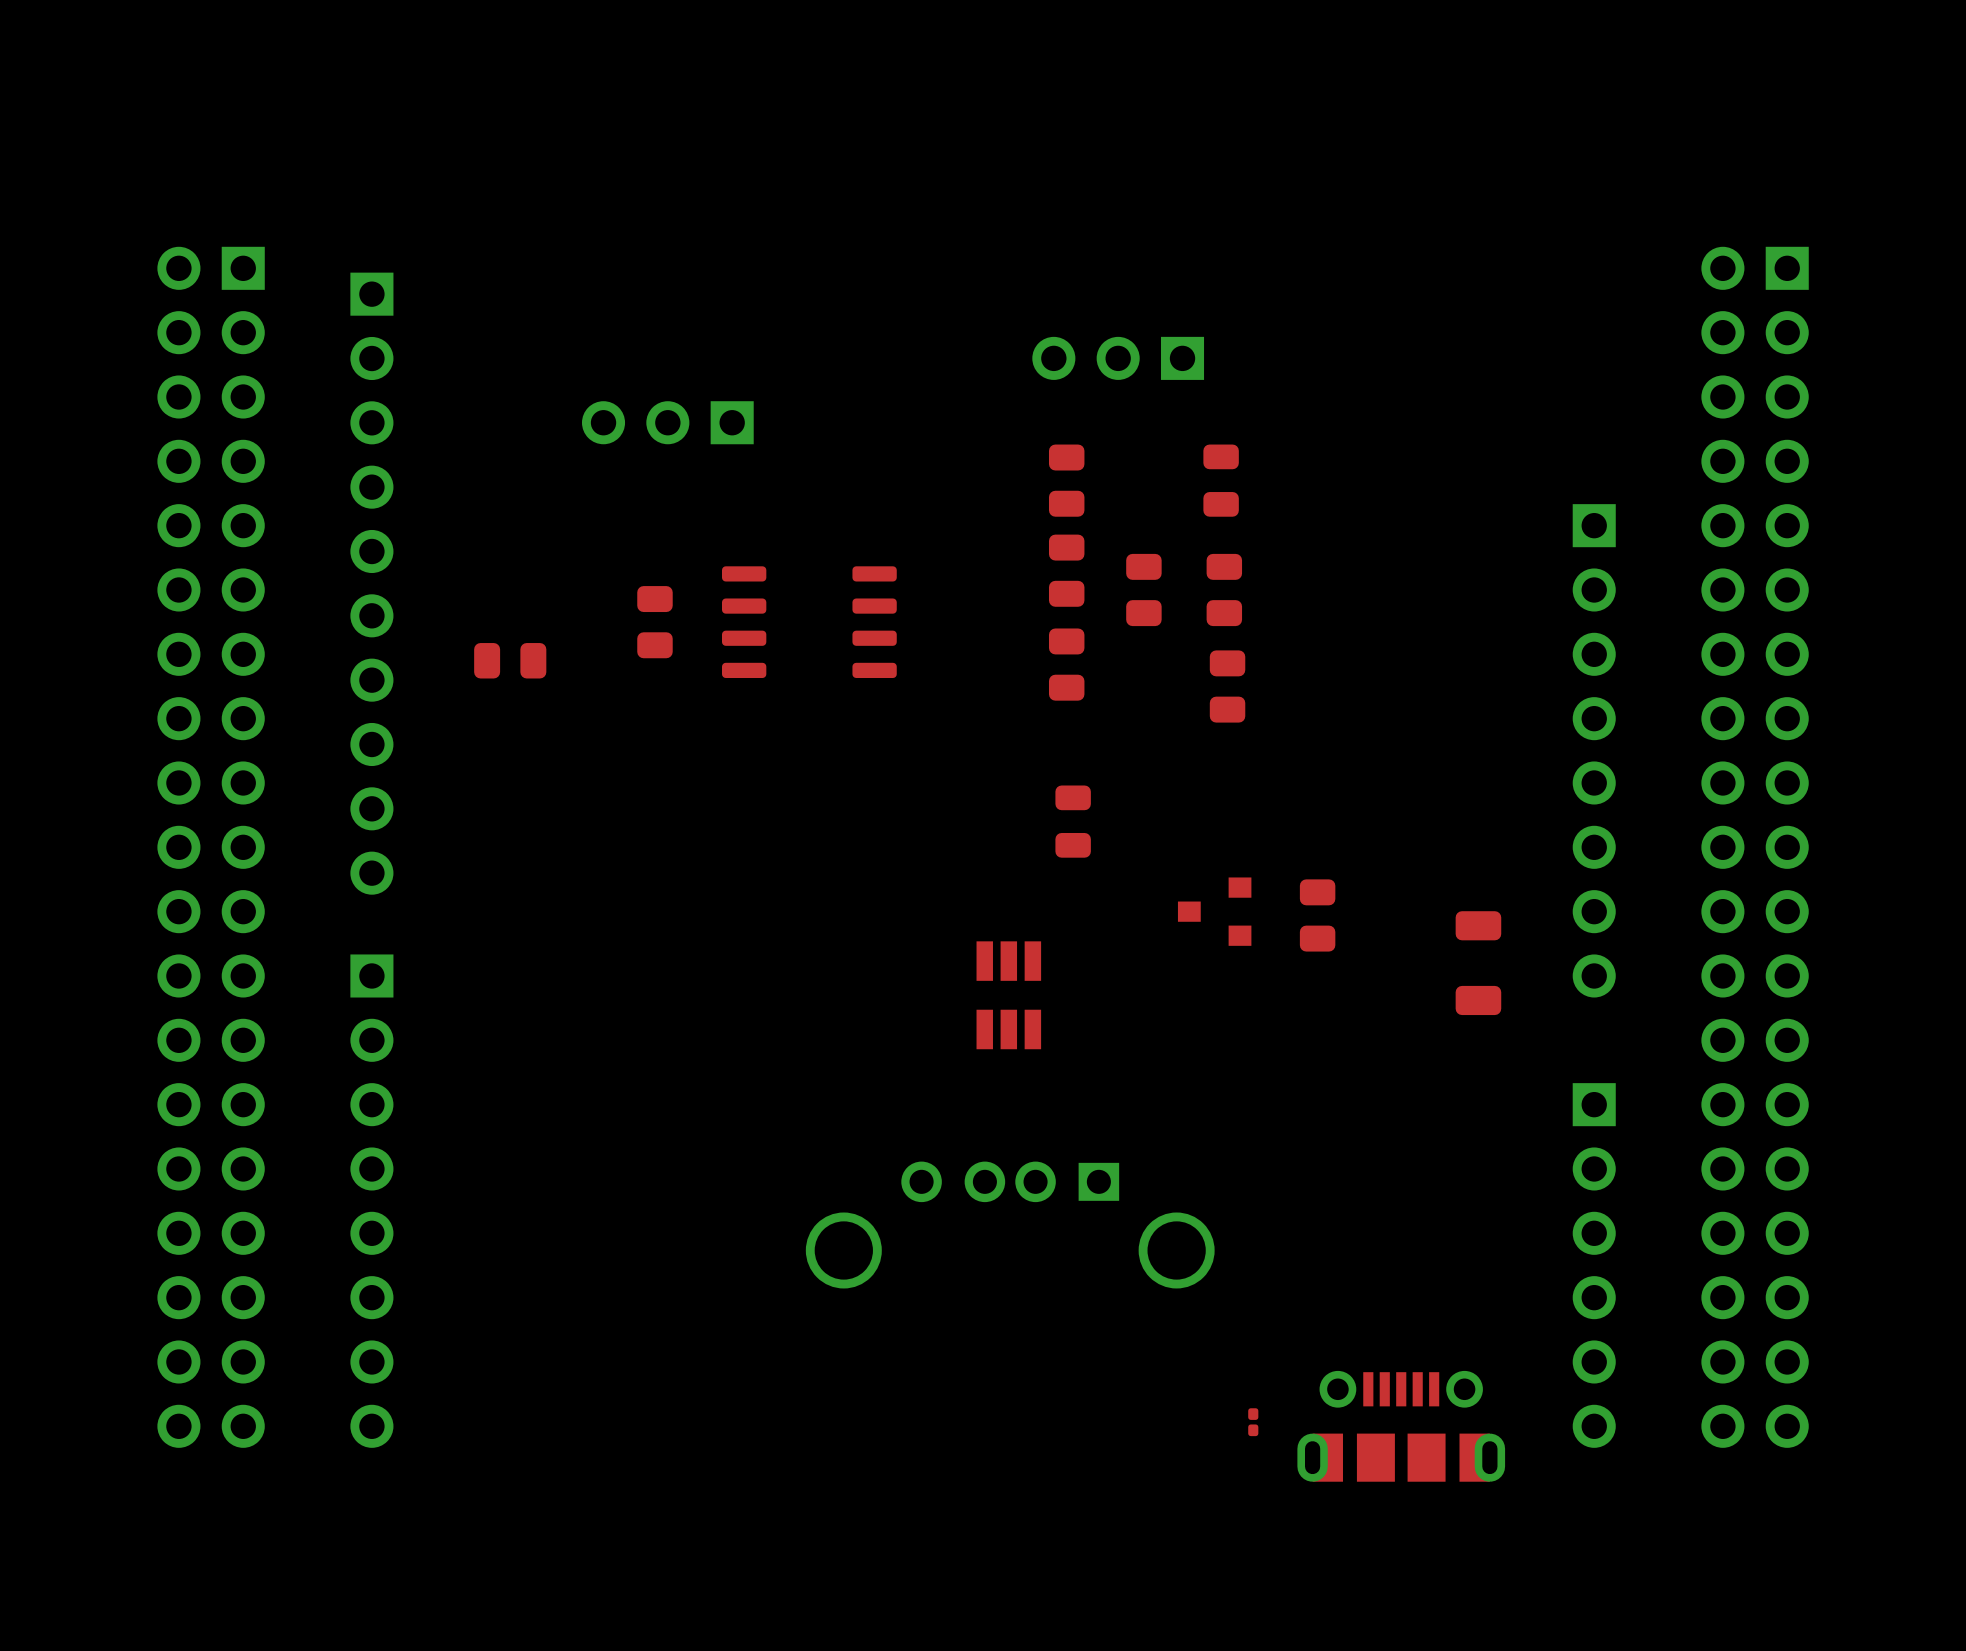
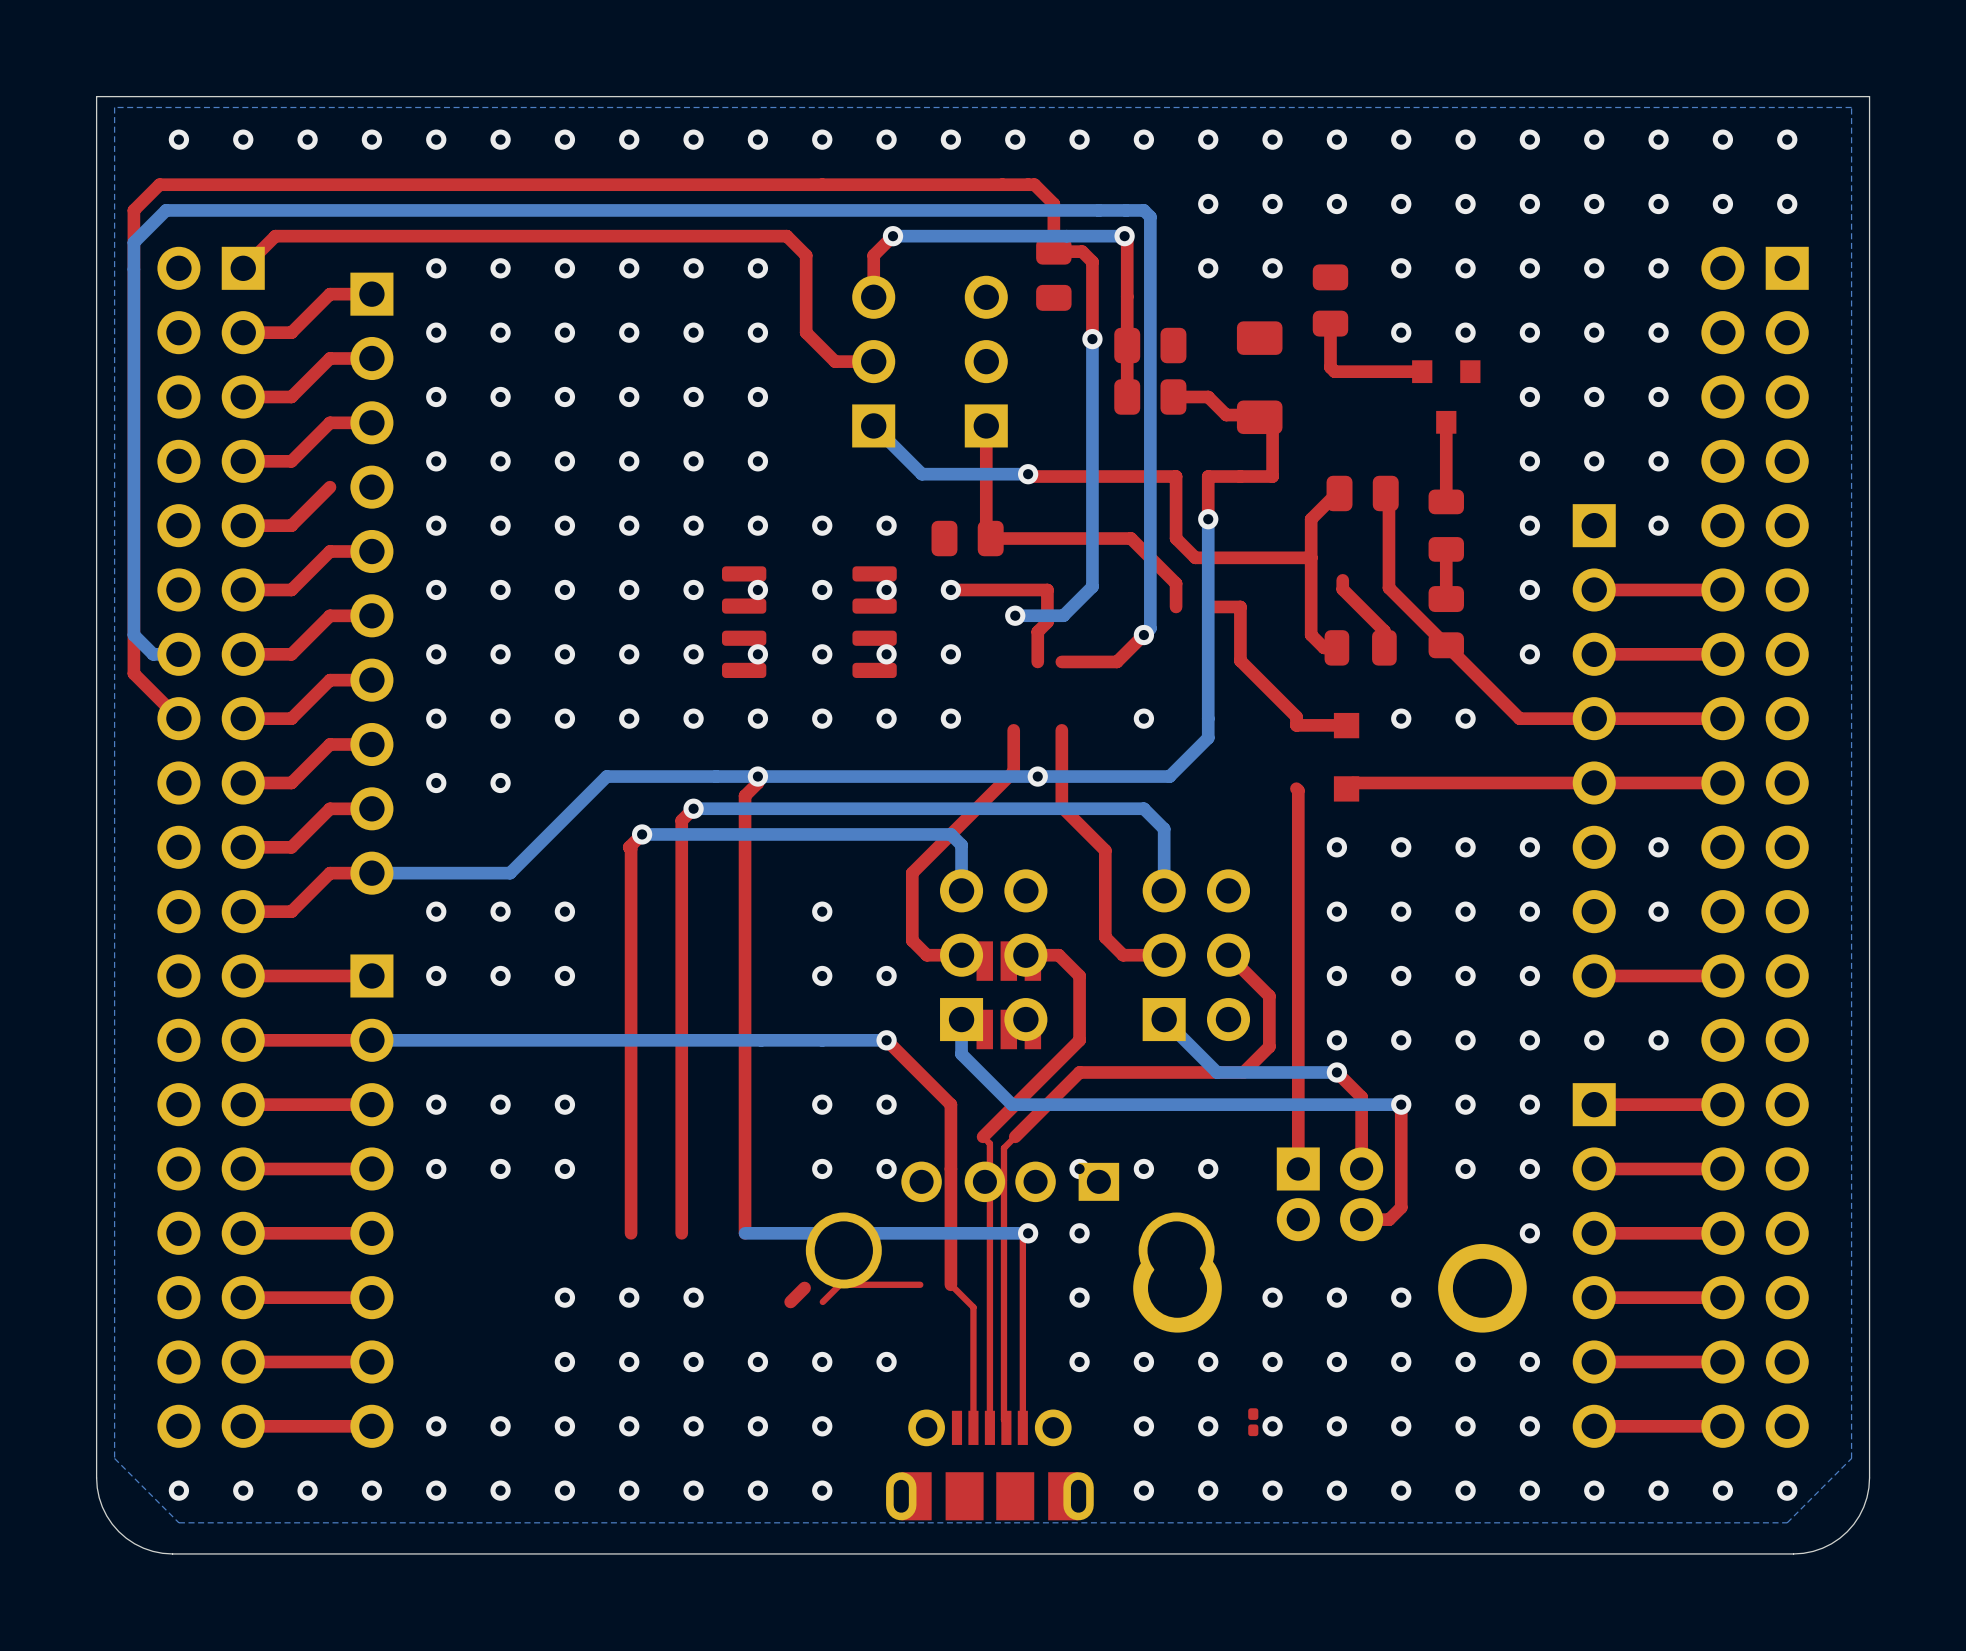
board edge: none -> (1869, 96) (1869, 1477) (1866, 1497) (1859, 1515) (1839, 1538) (1822, 1548) (1793, 1553) (172, 1553) (143, 1548) (126, 1538) (112, 1524) (102, 1507) (96, 1477) (96, 96) (1869, 96)
bottom zone outline: none -> (1851, 107) (1851, 1458) (1787, 1522) (178, 1522) (114, 1458) (114, 107) (1851, 107)
via: none -> (178, 139)
via: none -> (243, 139)
via: none -> (307, 139)
via: none -> (371, 139)
via: none -> (436, 139)
via: none -> (500, 139)
via: none -> (564, 139)
via: none -> (629, 139)
via: none -> (693, 139)
via: none -> (757, 139)
via: none -> (822, 139)
via: none -> (886, 139)
via: none -> (950, 139)
via: none -> (1015, 139)
via: none -> (1079, 139)
via: none -> (1143, 139)
via: none -> (1208, 139)
via: none -> (1272, 139)
via: none -> (1336, 139)
via: none -> (1401, 139)
via: none -> (1465, 139)
via: none -> (1529, 139)
via: none -> (1594, 139)
via: none -> (1658, 139)
via: none -> (1722, 139)
via: none -> (1787, 139)
via: none -> (1208, 203)
via: none -> (1272, 203)
via: none -> (1336, 203)
via: none -> (1401, 203)
via: none -> (1465, 203)
via: none -> (1529, 203)
via: none -> (1594, 203)
via: none -> (1658, 203)
via: none -> (1722, 203)
via: none -> (1787, 203)
top track: none -> (893, 236) (873, 255) (873, 297) (869, 301)
via: none -> (893, 236)
top track: none -> (1124, 236) (1127, 238) (1127, 396)
bottom track: none -> (1124, 236) (893, 236)
via: none -> (1124, 236)
top track: none -> (243, 268) (275, 236) (786, 236) (806, 255) (806, 332) (835, 361) (873, 361)
via: none -> (436, 268)
via: none -> (500, 268)
via: none -> (564, 268)
via: none -> (629, 268)
via: none -> (693, 268)
via: none -> (757, 268)
via: none -> (1208, 268)
via: none -> (1272, 268)
via: none -> (1401, 268)
via: none -> (1465, 268)
via: none -> (1529, 268)
via: none -> (1594, 268)
via: none -> (1658, 268)
part: none -> (1053, 274)
top track: none -> (371, 294) (330, 294) (291, 332) (243, 332)
part: none -> (1330, 300)
top track: none -> (1330, 323) (1330, 367) (1334, 371) (1422, 371)
via: none -> (436, 332)
via: none -> (500, 332)
via: none -> (564, 332)
via: none -> (629, 332)
via: none -> (693, 332)
via: none -> (757, 332)
via: none -> (1401, 332)
via: none -> (1465, 332)
via: none -> (1529, 332)
via: none -> (1594, 332)
via: none -> (1658, 332)
top track: none -> (1092, 339) (1092, 261) (1082, 251) (1053, 251) (1053, 203) (1034, 184) (159, 184) (133, 210) (133, 673) (178, 718)
bottom track: none -> (1092, 339) (1092, 586) (1063, 615) (1015, 615)
via: none -> (1092, 339)
part: none -> (1150, 345)
top track: none -> (371, 358) (330, 358) (291, 396) (243, 396)
part: (1118, 358) -> none
part: none -> (873, 361)
part: none -> (986, 361)
part: none -> (1259, 377)
top track: none -> (1174, 395) (1173, 396) (1208, 396) (1226, 415) (1259, 415) (1272, 427) (1272, 476) (1208, 476) (1208, 519)
via: none -> (436, 396)
via: none -> (500, 396)
via: none -> (564, 396)
via: none -> (629, 396)
via: none -> (693, 396)
via: none -> (757, 396)
part: none -> (1150, 396)
via: none -> (1529, 396)
via: none -> (1594, 396)
via: none -> (1658, 396)
top track: none -> (371, 422) (330, 422) (291, 461) (243, 461)
part: (667, 422) -> none
top track: none -> (1446, 422) (1446, 501)
bottom track: none -> (873, 425) (921, 474) (1028, 474)
top track: none -> (986, 425) (986, 534) (990, 538) (1131, 538) (1176, 583) (1176, 606)
via: none -> (436, 461)
via: none -> (500, 461)
via: none -> (564, 461)
via: none -> (629, 461)
via: none -> (693, 461)
via: none -> (757, 461)
via: none -> (1529, 461)
via: none -> (1594, 461)
via: none -> (1658, 461)
top track: none -> (1028, 474) (1030, 476) (1176, 476) (1176, 538) (1195, 557) (1311, 557)
via: none -> (1028, 474)
part: (1066, 480) -> none
part: (1221, 480) -> none
top track: none -> (330, 487) (291, 525) (243, 525)
top track: none -> (1339, 493) (1336, 493) (1311, 519) (1311, 635) (1324, 647) (1336, 647)
part: none -> (1362, 493)
top track: none -> (1385, 493) (1388, 496) (1388, 587) (1519, 718) (1722, 718)
bottom track: none -> (1208, 519) (1208, 737) (1169, 776) (606, 776) (510, 873) (371, 873)
via: none -> (1208, 519)
via: none -> (436, 525)
via: none -> (500, 525)
via: none -> (564, 525)
via: none -> (629, 525)
via: none -> (693, 525)
via: none -> (757, 525)
via: none -> (822, 525)
via: none -> (886, 525)
part: none -> (1446, 525)
via: none -> (1529, 525)
via: none -> (1658, 525)
part: none -> (967, 538)
top track: none -> (1446, 549) (1446, 599)
top track: none -> (371, 551) (330, 551) (291, 589) (243, 589)
part: (1066, 570) -> none
top track: none -> (1342, 580) (1342, 589) (1384, 631) (1384, 647)
via: none -> (436, 589)
via: none -> (500, 589)
via: none -> (564, 589)
via: none -> (629, 589)
via: none -> (693, 589)
via: none -> (757, 589)
via: none -> (822, 589)
via: none -> (886, 589)
top track: none -> (950, 589) (1047, 589) (1047, 622) (1037, 631) (1037, 661)
via: none -> (950, 589)
part: (1143, 589) -> none
part: (1224, 589) -> none
via: none -> (1529, 589)
top track: none -> (1722, 589) (1594, 589)
top track: none -> (1208, 606) (1240, 606) (1240, 660) (1296, 716) (1296, 725) (1347, 725)
top track: none -> (371, 615) (330, 615) (291, 654) (243, 654)
via: none -> (1015, 615)
part: (654, 622) -> none
part: none -> (1446, 622)
top track: none -> (1143, 635) (1116, 661) (1061, 661)
bottom track: none -> (1143, 635) (1150, 628) (1150, 216) (1143, 210) (166, 210) (133, 242) (133, 635) (153, 654) (178, 654)
via: none -> (1143, 635)
part: none -> (1360, 647)
via: none -> (436, 654)
via: none -> (500, 654)
via: none -> (564, 654)
via: none -> (629, 654)
via: none -> (693, 654)
via: none -> (757, 654)
via: none -> (822, 654)
via: none -> (886, 654)
via: none -> (950, 654)
via: none -> (1529, 654)
top track: none -> (1722, 654) (1594, 654)
part: (510, 660) -> none
part: (1066, 664) -> none
top track: none -> (371, 680) (330, 680) (291, 718) (243, 718)
part: (1227, 686) -> none
via: none -> (436, 718)
via: none -> (500, 718)
via: none -> (564, 718)
via: none -> (629, 718)
via: none -> (693, 718)
via: none -> (757, 718)
via: none -> (822, 718)
via: none -> (886, 718)
via: none -> (950, 718)
via: none -> (1143, 718)
via: none -> (1401, 718)
via: none -> (1465, 718)
top track: none -> (1013, 730) (1013, 771) (912, 873) (912, 940) (926, 955) (961, 955)
top track: none -> (1061, 730) (1061, 807) (1105, 850) (1105, 937) (1123, 955) (1164, 955)
top track: none -> (371, 744) (330, 744) (291, 782) (243, 782)
part: none -> (1346, 757)
top track: none -> (757, 776) (757, 782) (745, 795) (745, 1233)
via: none -> (757, 776)
via: none -> (1037, 776)
via: none -> (436, 782)
via: none -> (500, 782)
top track: none -> (1722, 782) (1352, 782) (1347, 788)
top track: none -> (1296, 788) (1298, 790) (1298, 1168) (1296, 1167)
top track: none -> (371, 808) (330, 808) (291, 847) (243, 847)
top track: none -> (693, 808) (681, 820) (681, 1233)
bottom track: none -> (693, 808) (1143, 808) (1164, 828) (1164, 890)
via: none -> (693, 808)
part: (1073, 821) -> none
top track: none -> (642, 834) (629, 847) (631, 849) (631, 1233)
bottom track: none -> (642, 834) (950, 834) (961, 845) (961, 890)
via: none -> (642, 834)
via: none -> (1336, 847)
via: none -> (1401, 847)
via: none -> (1465, 847)
via: none -> (1529, 847)
via: none -> (1658, 847)
top track: none -> (371, 873) (330, 873) (291, 911) (243, 911)
via: none -> (436, 911)
via: none -> (500, 911)
via: none -> (564, 911)
via: none -> (822, 911)
part rotation: 0° (1214, 911) -> 90° counterclockwise (1446, 396)
part position: (1214, 911) -> (1446, 396)
via: none -> (1336, 911)
via: none -> (1401, 911)
via: none -> (1465, 911)
via: none -> (1529, 911)
via: none -> (1658, 911)
part: (1317, 915) -> none
part: none -> (993, 955)
top track: none -> (1025, 955) (1058, 955) (1079, 975) (1079, 1040) (983, 1136) (989, 1143) (989, 1427)
part: none -> (1196, 955)
top track: none -> (1228, 955) (1269, 996) (1269, 1046) (1243, 1072) (1079, 1072) (1003, 1148) (1003, 1419) (1006, 1422) (1006, 1427)
part: (1478, 963) -> none
top track: none -> (371, 975) (243, 975)
via: none -> (436, 975)
via: none -> (500, 975)
via: none -> (564, 975)
via: none -> (822, 975)
via: none -> (886, 975)
via: none -> (1336, 975)
via: none -> (1401, 975)
via: none -> (1465, 975)
via: none -> (1529, 975)
top track: none -> (1722, 975) (1594, 975)
bottom track: none -> (1165, 1017) (1164, 1019) (1217, 1072) (1336, 1072)
bottom track: none -> (961, 1019) (961, 1054) (1012, 1104) (1401, 1104)
top track: none -> (371, 1040) (243, 1040)
top track: none -> (886, 1040) (950, 1104) (950, 1284) (973, 1307) (973, 1427)
bottom track: none -> (886, 1040) (371, 1040)
via: none -> (886, 1040)
via: none -> (1336, 1040)
via: none -> (1401, 1040)
via: none -> (1465, 1040)
via: none -> (1529, 1040)
via: none -> (1594, 1040)
via: none -> (1658, 1040)
top track: none -> (1336, 1072) (1361, 1097) (1361, 1168)
via: none -> (1336, 1072)
top track: none -> (371, 1104) (243, 1104)
via: none -> (436, 1104)
via: none -> (500, 1104)
via: none -> (564, 1104)
via: none -> (822, 1104)
via: none -> (886, 1104)
top track: none -> (1401, 1104) (1401, 1207) (1389, 1219) (1361, 1219)
via: none -> (1401, 1104)
via: none -> (1465, 1104)
via: none -> (1529, 1104)
top track: none -> (1722, 1104) (1594, 1104)
top track: none -> (371, 1168) (243, 1168)
via: none -> (436, 1168)
via: none -> (500, 1168)
via: none -> (564, 1168)
via: none -> (822, 1168)
via: none -> (886, 1168)
via: none -> (1079, 1168)
via: none -> (1143, 1168)
via: none -> (1208, 1168)
via: none -> (1465, 1168)
via: none -> (1529, 1168)
top track: none -> (1722, 1168) (1594, 1168)
top track: none -> (371, 1233) (243, 1233)
top track: none -> (1028, 1233) (1022, 1238) (1022, 1427)
bottom track: none -> (1028, 1233) (745, 1233)
via: none -> (1028, 1233)
via: none -> (1079, 1233)
via: none -> (1529, 1233)
top track: none -> (1722, 1233) (1594, 1233)
part: none -> (1329, 1240)
top track: none -> (920, 1284) (839, 1284) (822, 1301)
top track: none -> (804, 1288) (790, 1301)
top track: none -> (371, 1297) (243, 1297)
via: none -> (564, 1297)
via: none -> (629, 1297)
via: none -> (693, 1297)
via: none -> (1079, 1297)
via: none -> (1272, 1297)
via: none -> (1336, 1297)
via: none -> (1401, 1297)
top track: none -> (1722, 1297) (1594, 1297)
top track: none -> (371, 1361) (243, 1361)
via: none -> (564, 1361)
via: none -> (629, 1361)
via: none -> (693, 1361)
via: none -> (757, 1361)
via: none -> (822, 1361)
via: none -> (886, 1361)
via: none -> (1079, 1361)
via: none -> (1143, 1361)
via: none -> (1208, 1361)
via: none -> (1272, 1361)
via: none -> (1336, 1361)
via: none -> (1401, 1361)
via: none -> (1465, 1361)
via: none -> (1529, 1361)
top track: none -> (1722, 1361) (1594, 1361)
top track: none -> (371, 1426) (243, 1426)
via: none -> (436, 1426)
via: none -> (500, 1426)
via: none -> (564, 1426)
via: none -> (629, 1426)
via: none -> (693, 1426)
via: none -> (757, 1426)
via: none -> (822, 1426)
via: none -> (1143, 1426)
via: none -> (1208, 1426)
via: none -> (1272, 1426)
via: none -> (1336, 1426)
part position: (1401, 1426) -> (989, 1464)
via: none -> (1401, 1426)
via: none -> (1465, 1426)
via: none -> (1529, 1426)
top track: none -> (1722, 1426) (1594, 1426)
via: none -> (178, 1490)
via: none -> (243, 1490)
via: none -> (307, 1490)
via: none -> (371, 1490)
via: none -> (436, 1490)
via: none -> (500, 1490)
via: none -> (564, 1490)
via: none -> (629, 1490)
via: none -> (693, 1490)
via: none -> (757, 1490)
via: none -> (822, 1490)
via: none -> (1143, 1490)
via: none -> (1208, 1490)
via: none -> (1272, 1490)
via: none -> (1336, 1490)
via: none -> (1401, 1490)
via: none -> (1465, 1490)
via: none -> (1529, 1490)
via: none -> (1594, 1490)
via: none -> (1658, 1490)
via: none -> (1722, 1490)
via: none -> (1787, 1490)

